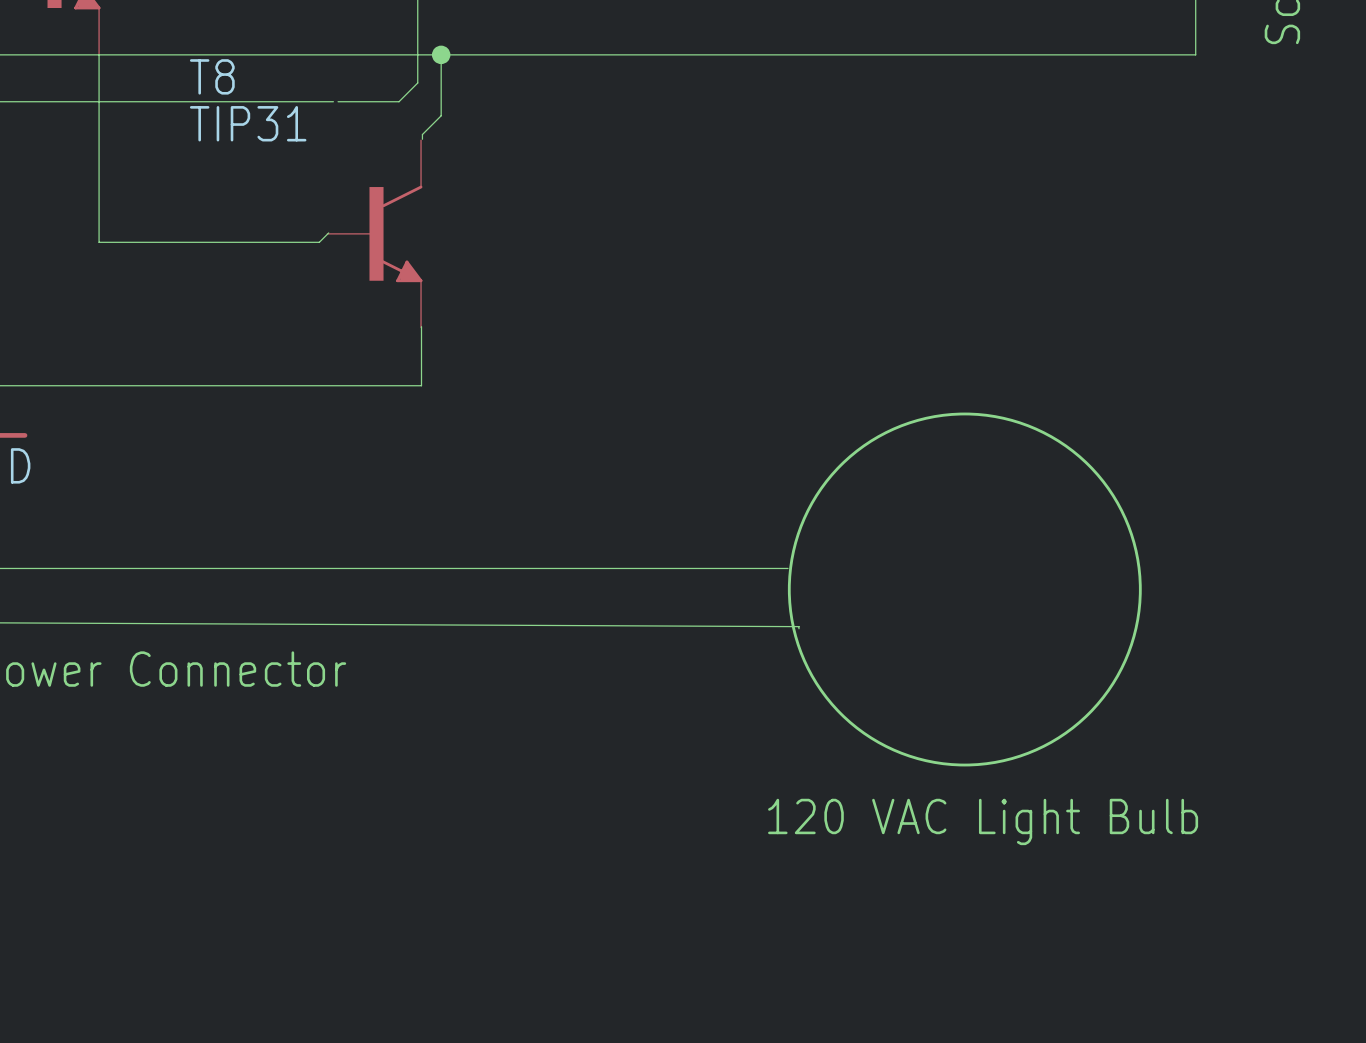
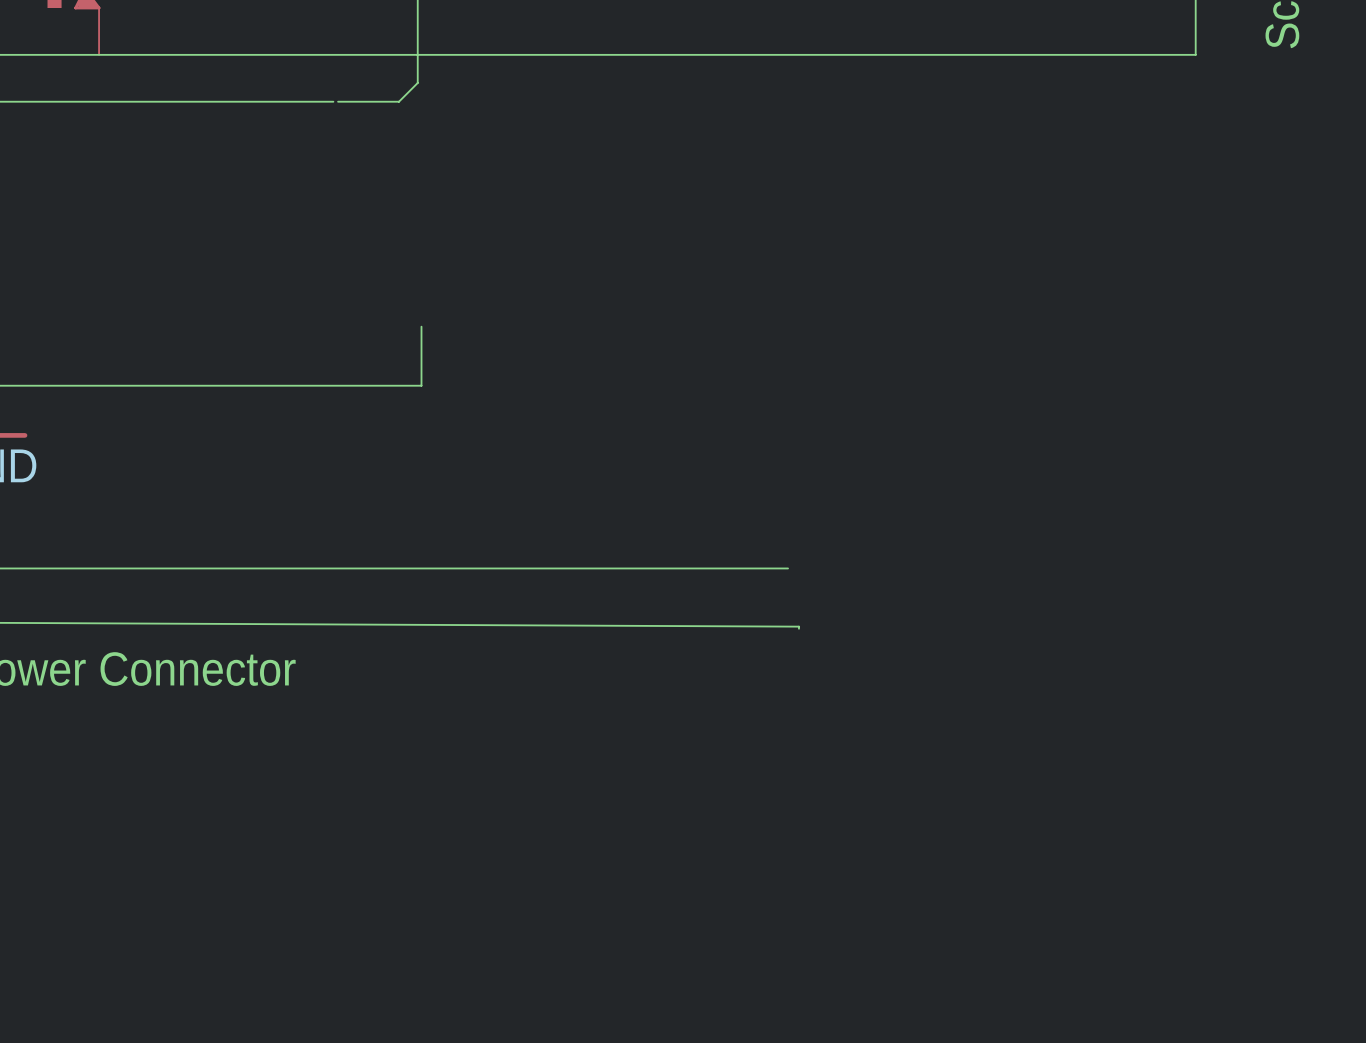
wire: (99, 54) (99, 242) (319, 242) (328, 232) -> none
wire: (441, 54) (441, 115) (422, 134) (422, 139) -> none
junction: (441, 54) -> none
T8: TIP31 (374, 233) -> none
drawing: [787, 412, 1142, 767] -> none
text: 120 VAC Light Bulb (983, 821) -> none

